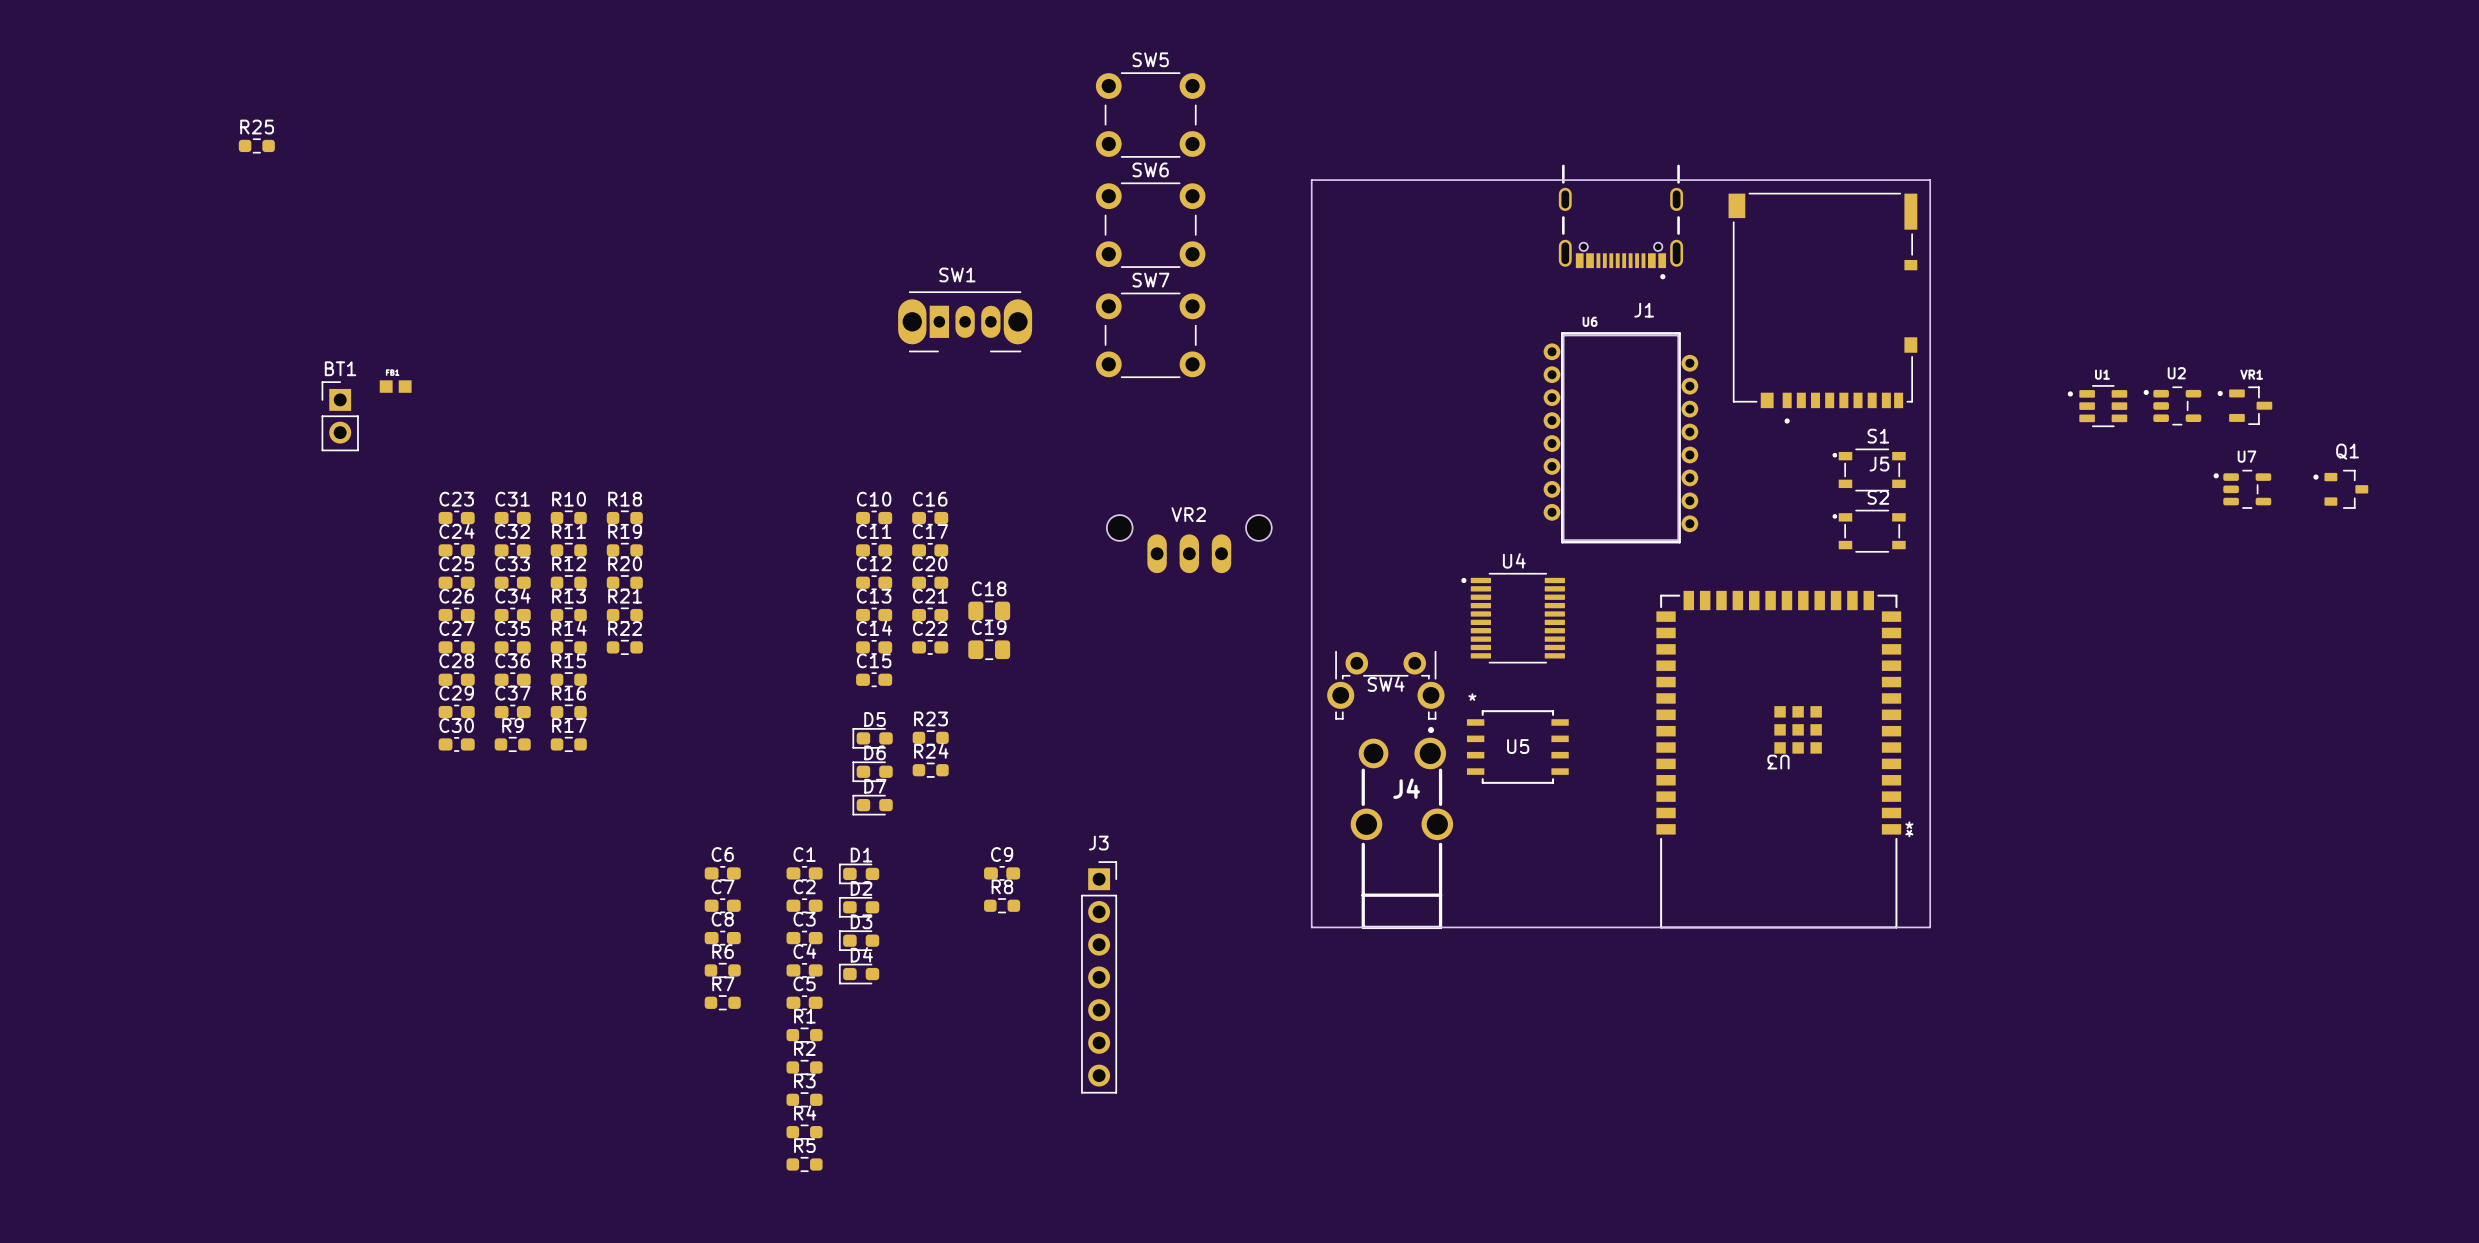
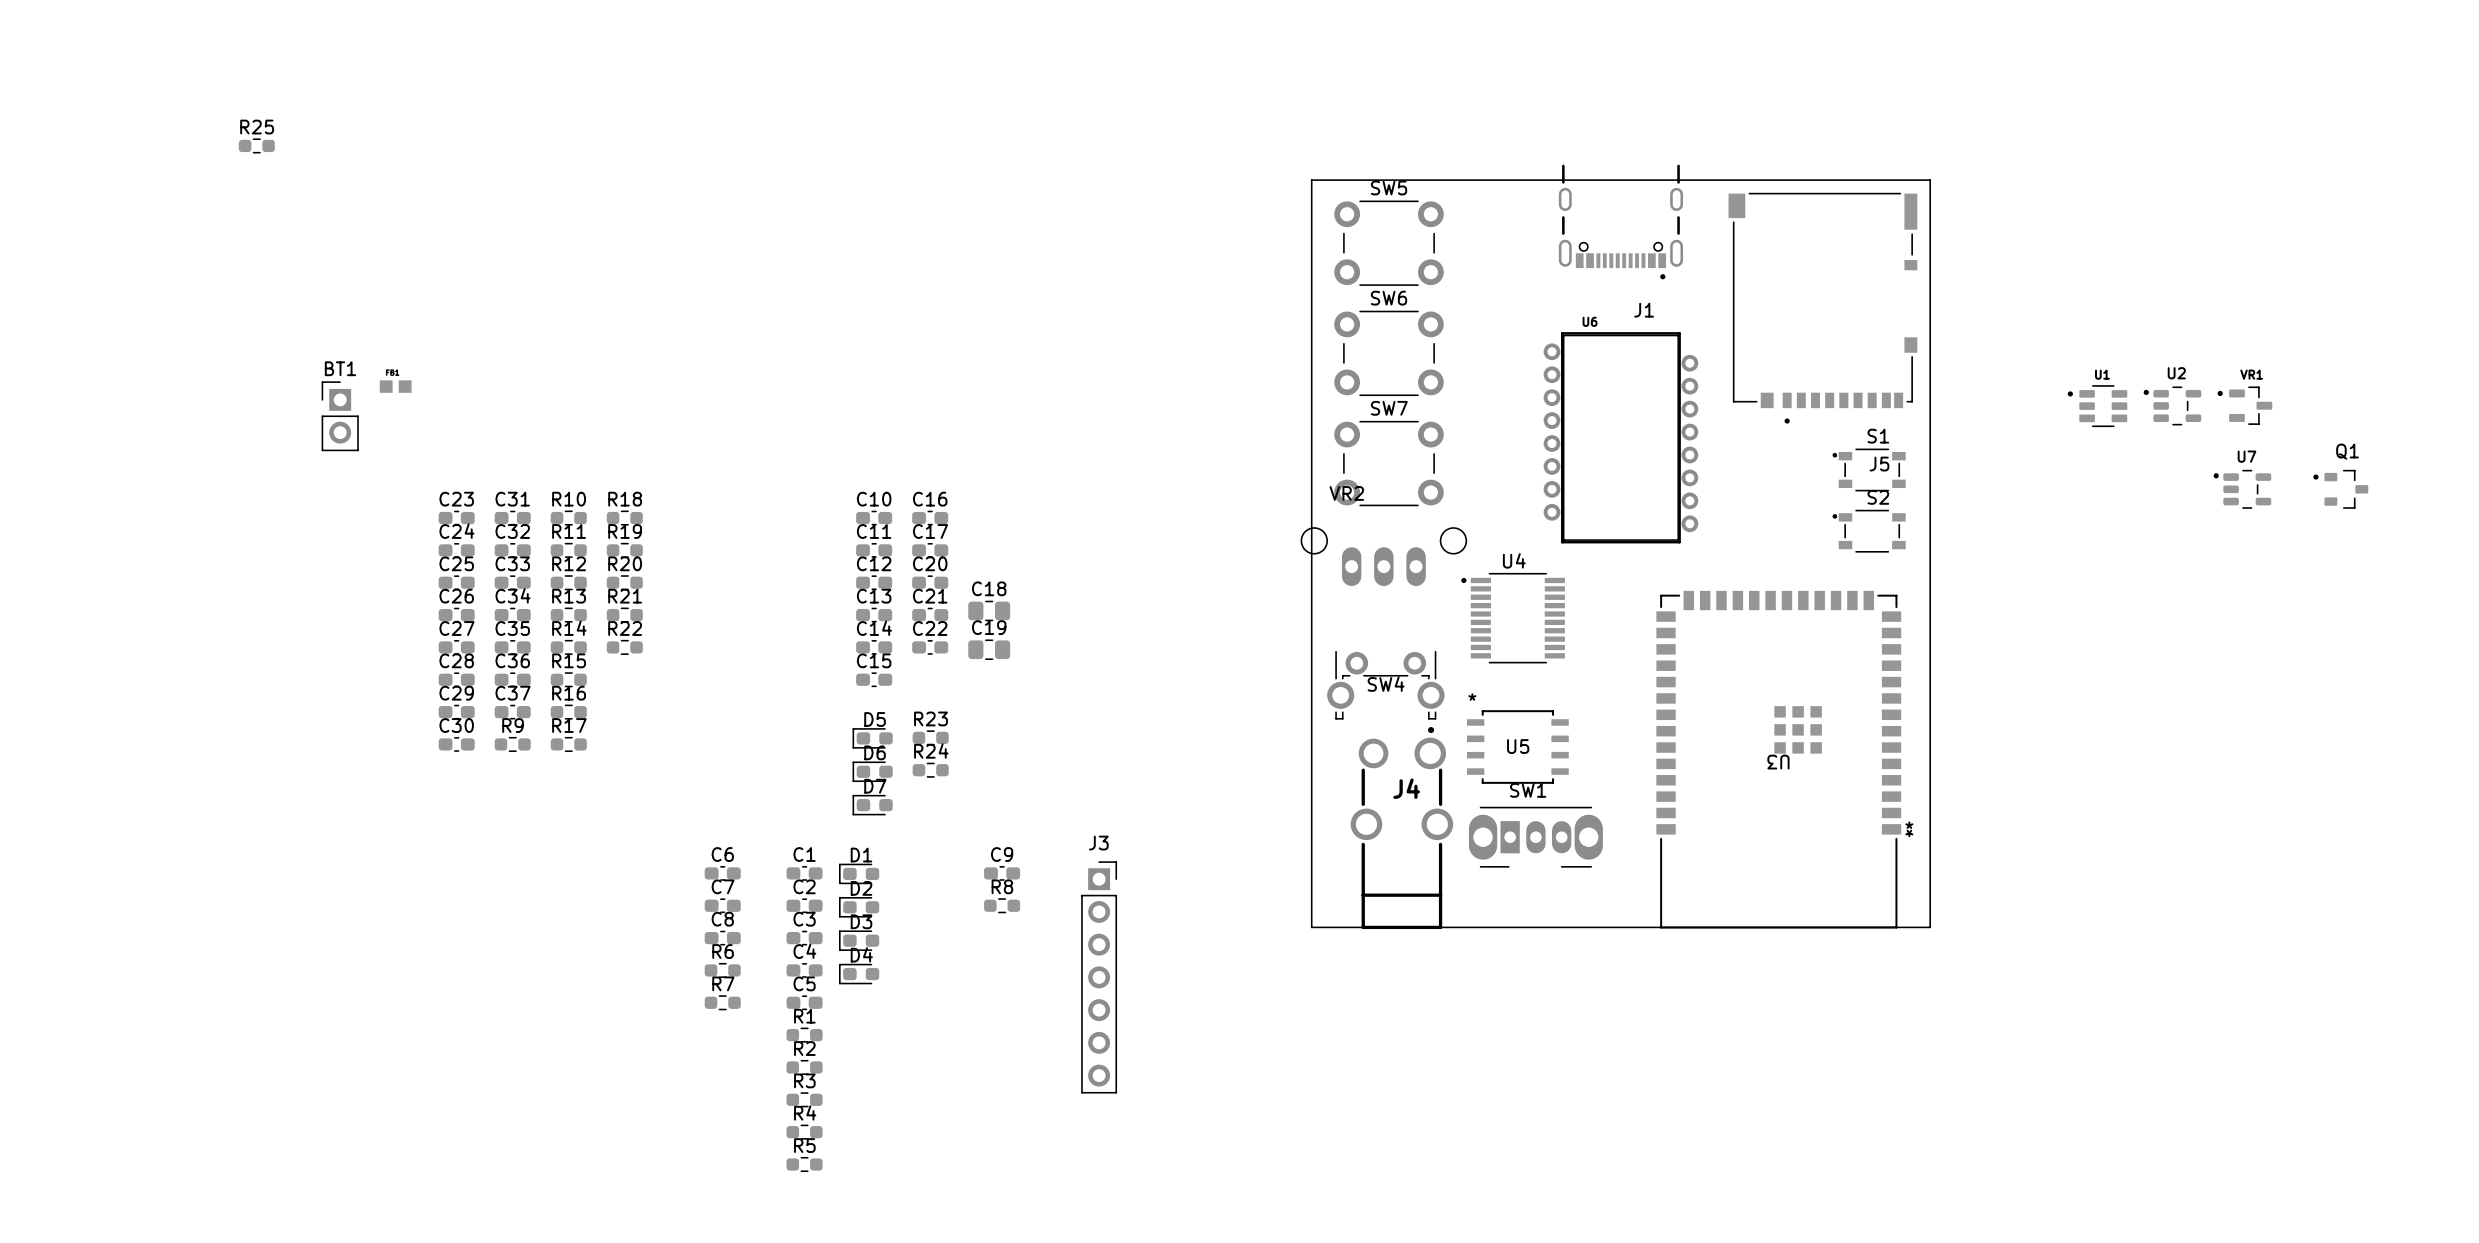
SW5 position: (1150, 115) -> (1389, 243)
SW6 position: (1150, 225) -> (1389, 353)
SW1 position: (965, 321) -> (1535, 837)
SW7 position: (1150, 335) -> (1389, 463)
VR2 name position: VR2 (1188, 514) -> VR2 (1346, 493)
VR2 position: (1189, 544) -> (1383, 557)

